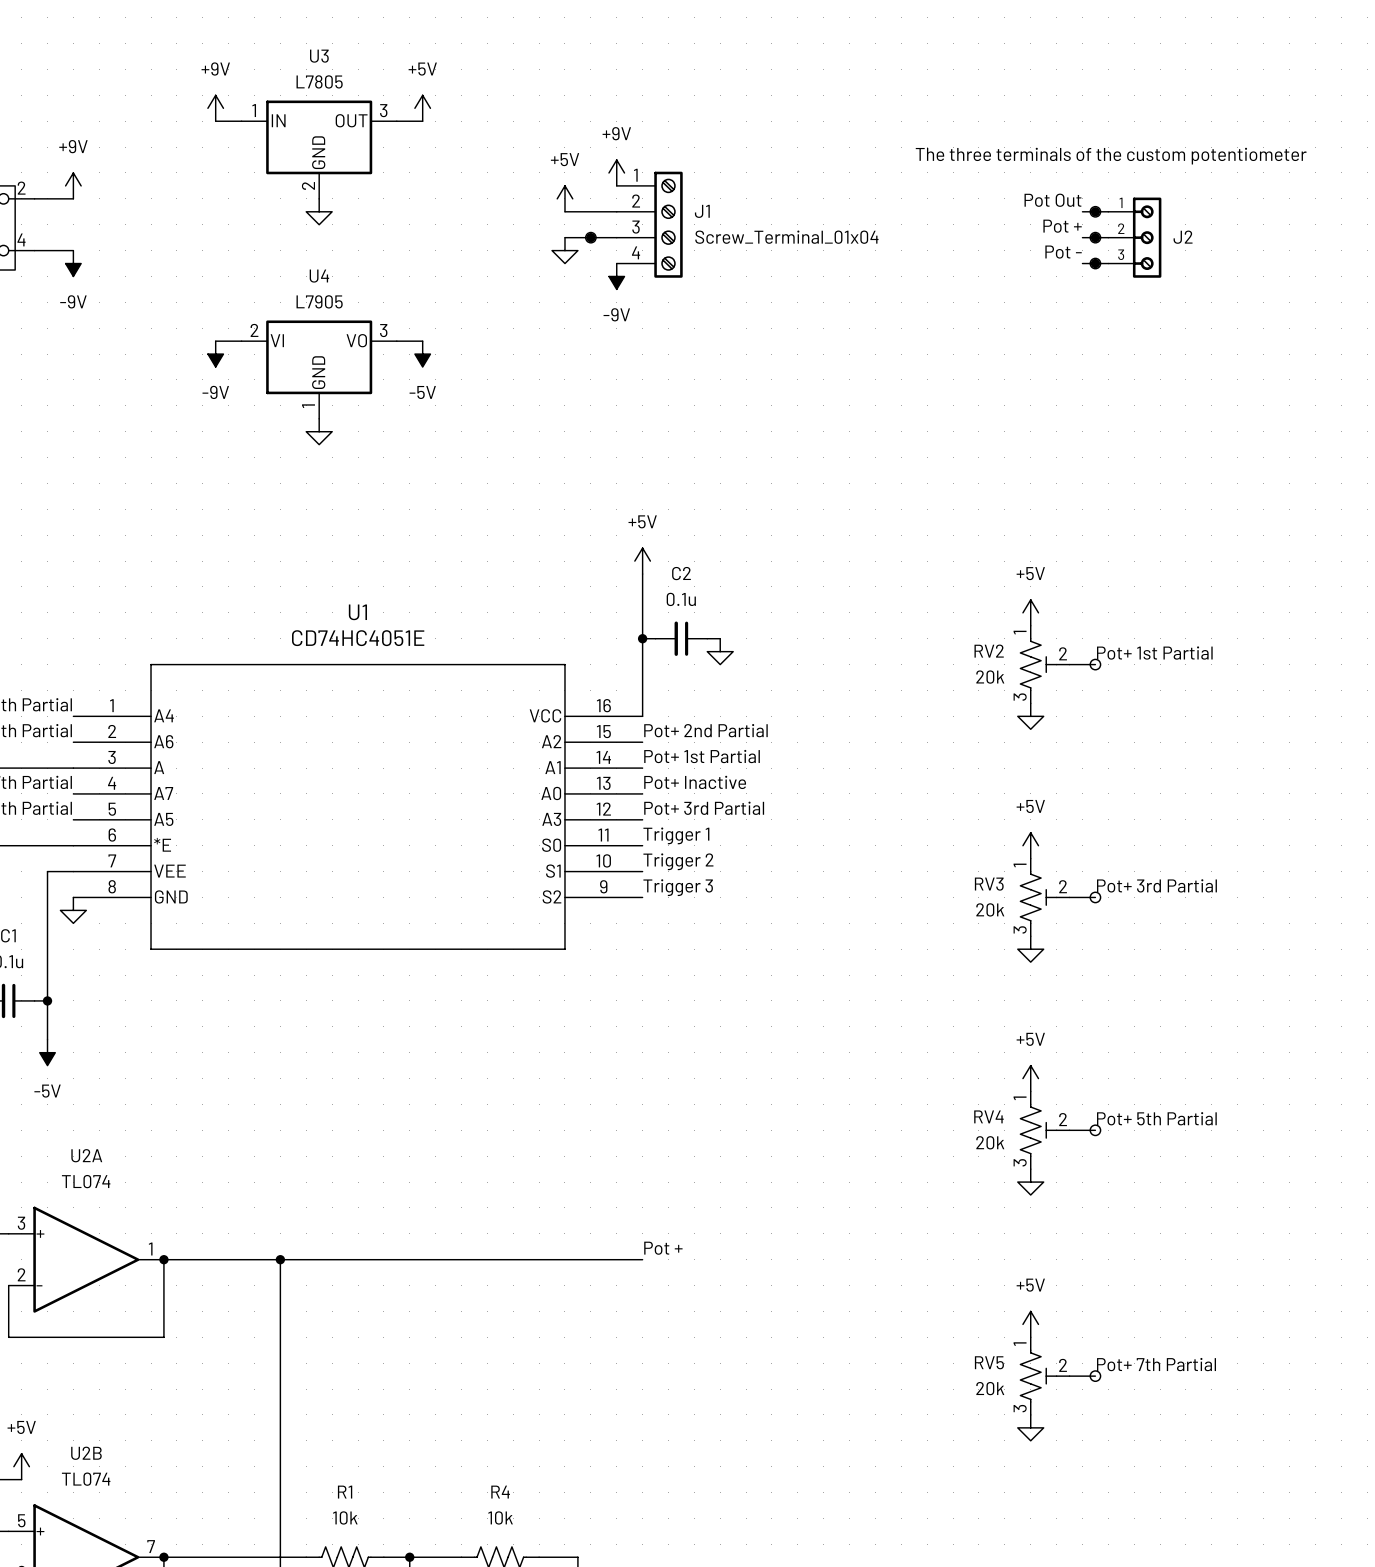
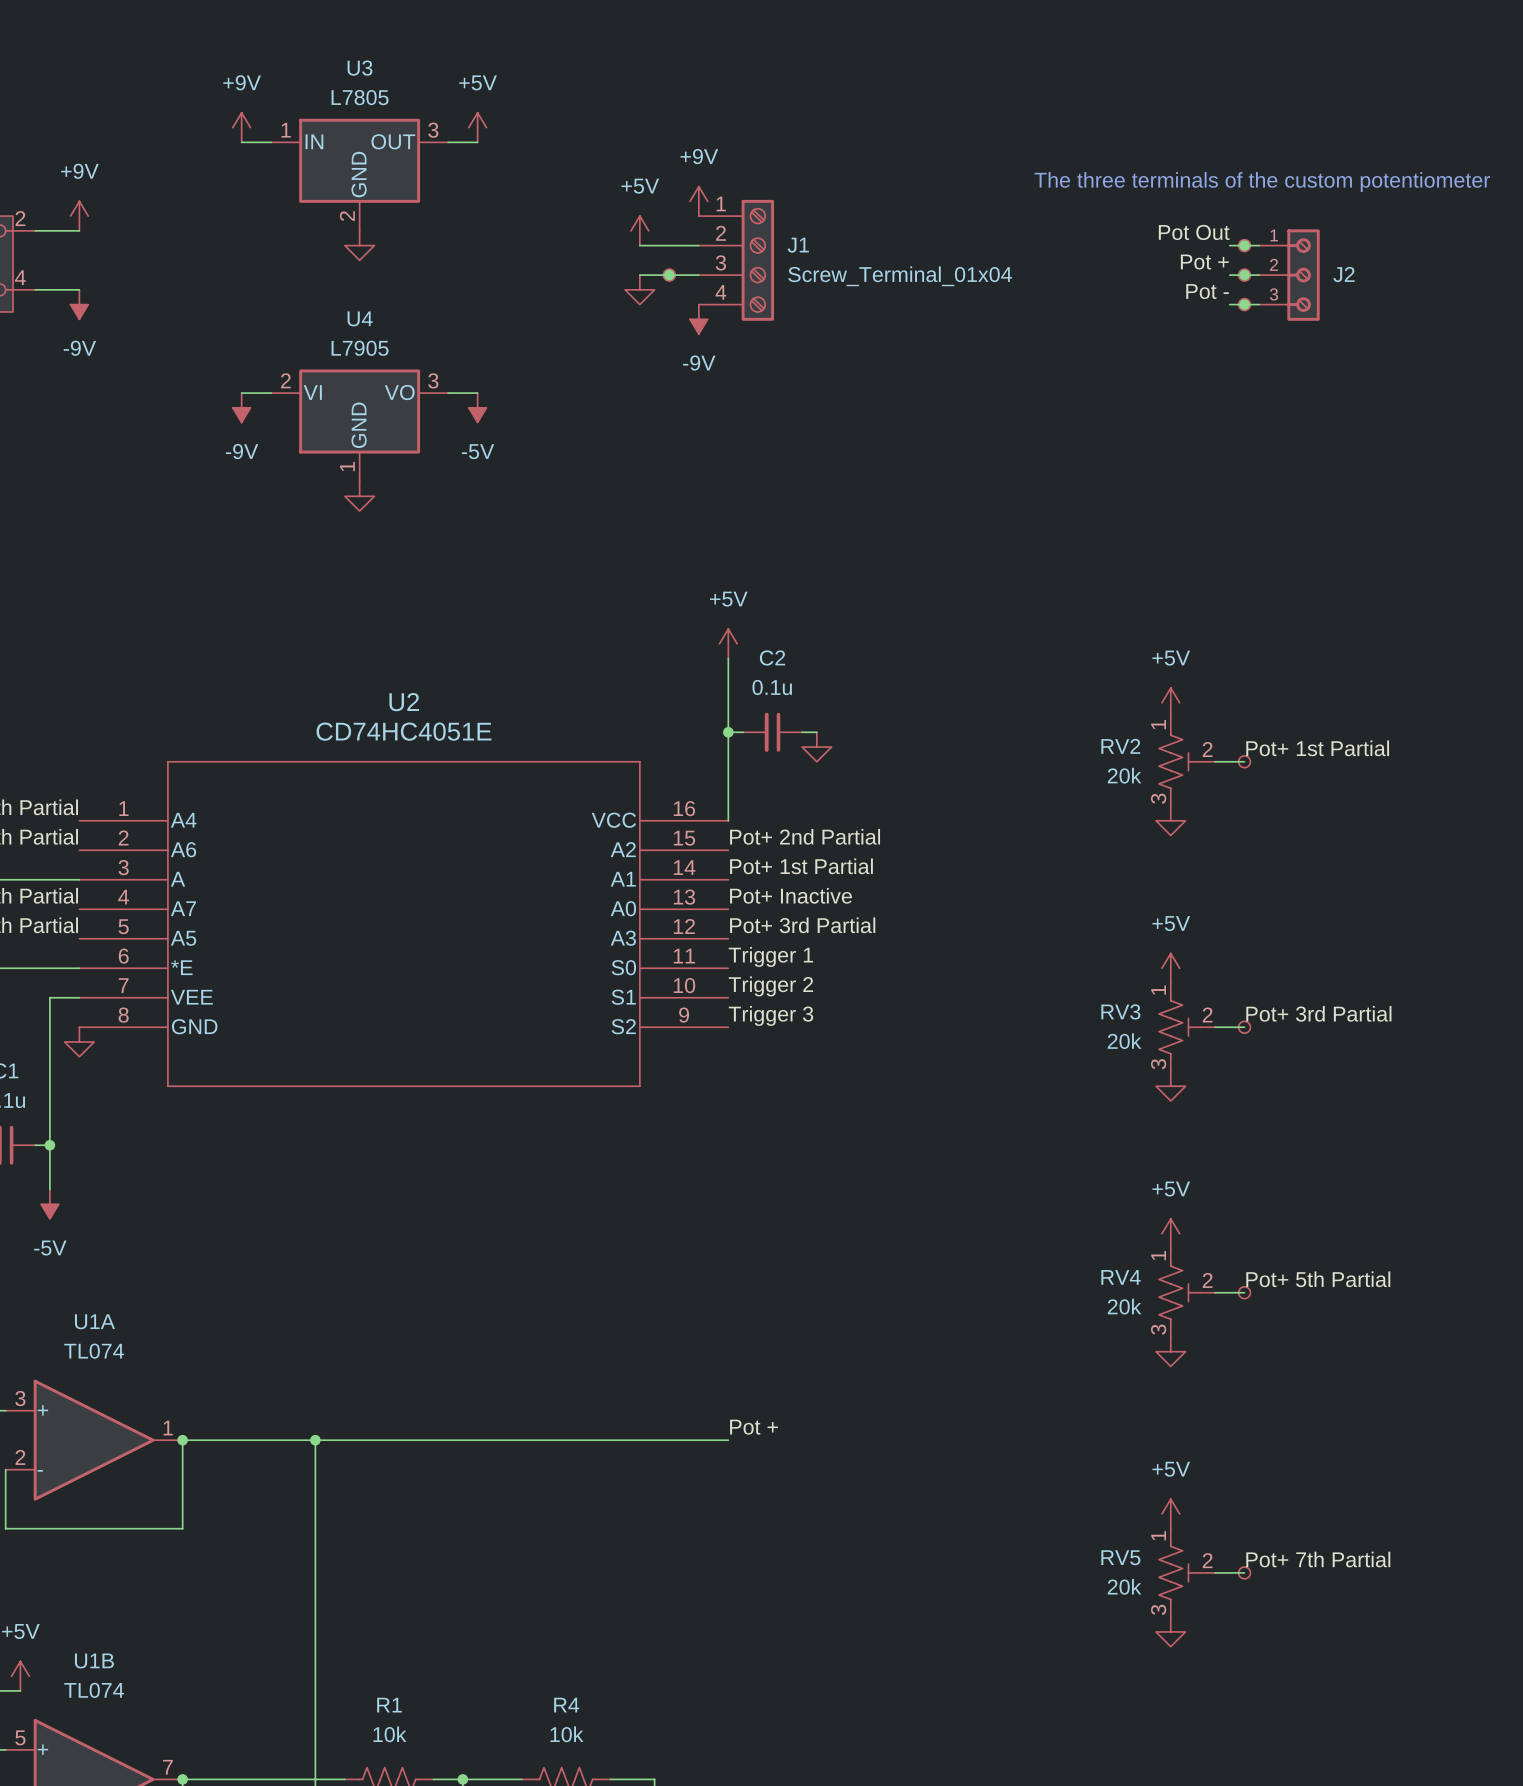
U1 name: U1 (357, 612) -> U2 (404, 702)
U2A name: U2A (86, 1155) -> U1A (94, 1321)
U2B name: U2B (86, 1453) -> U1B (94, 1660)

